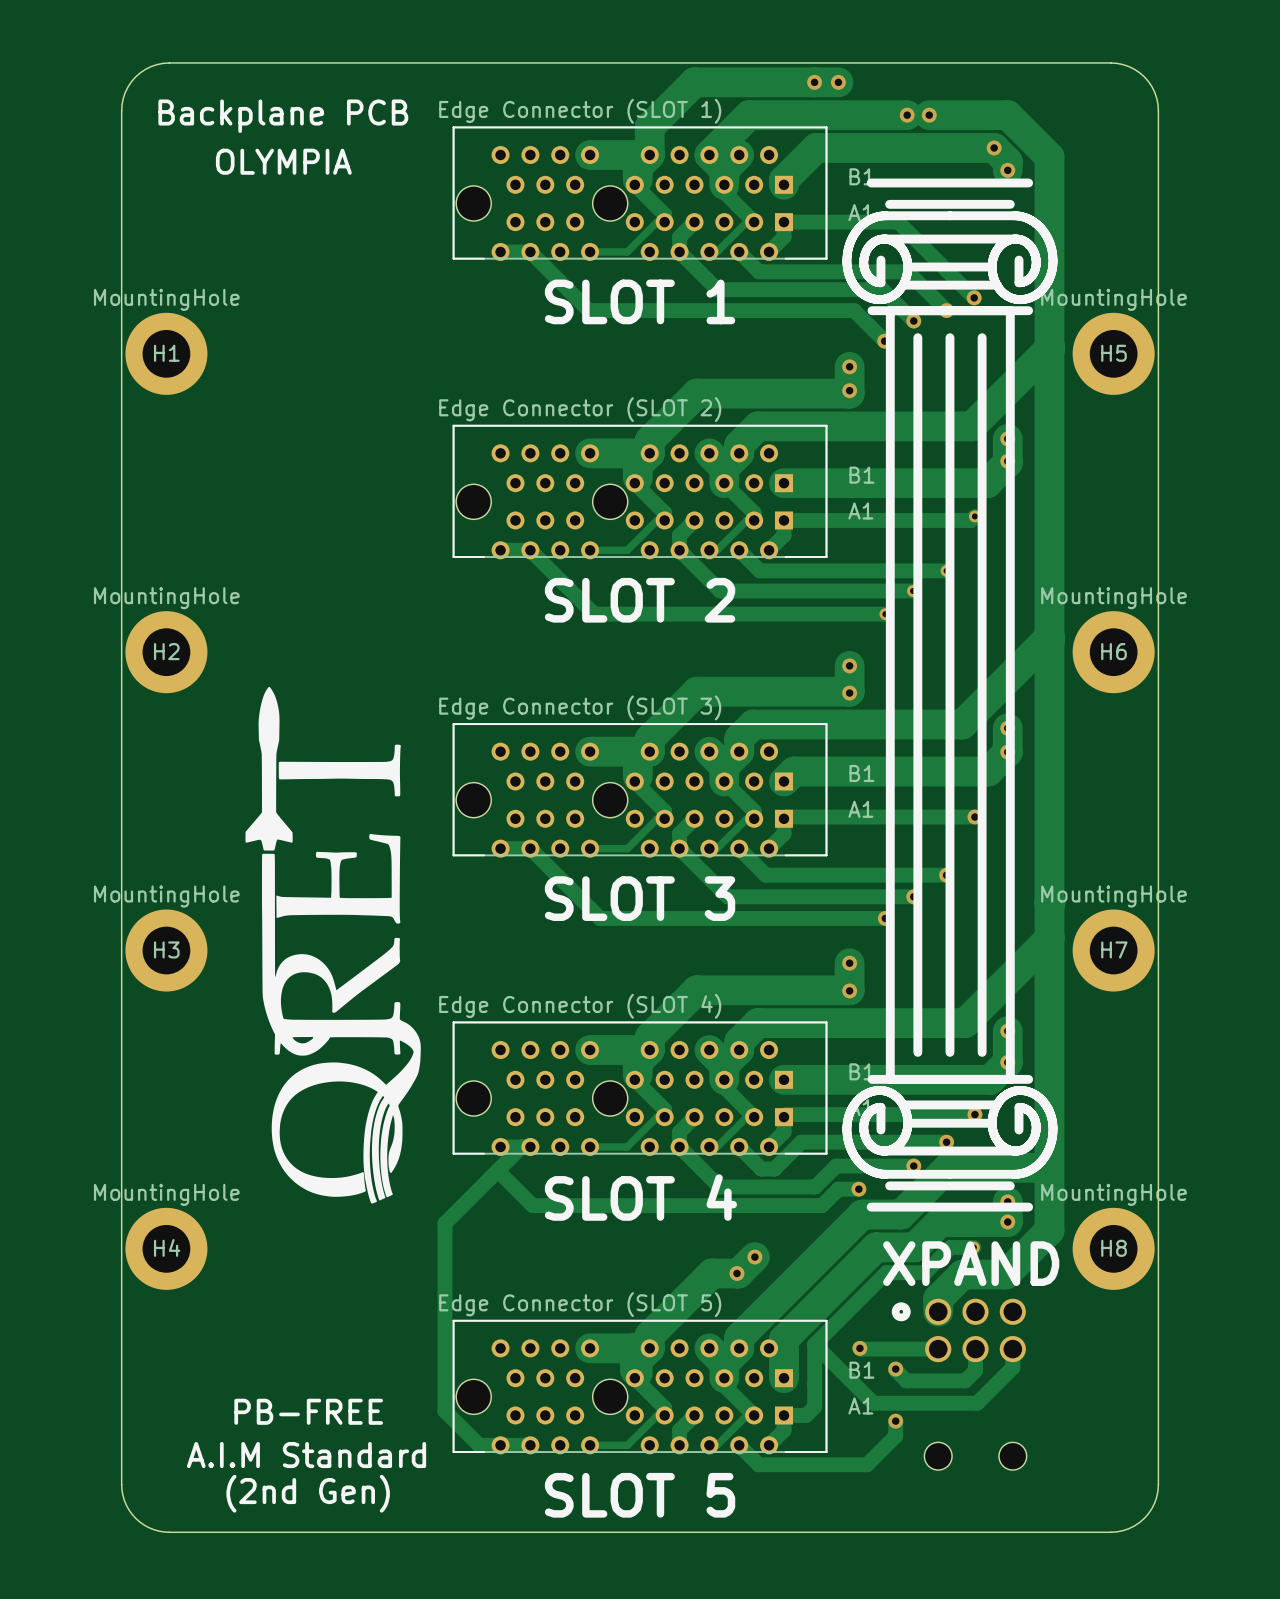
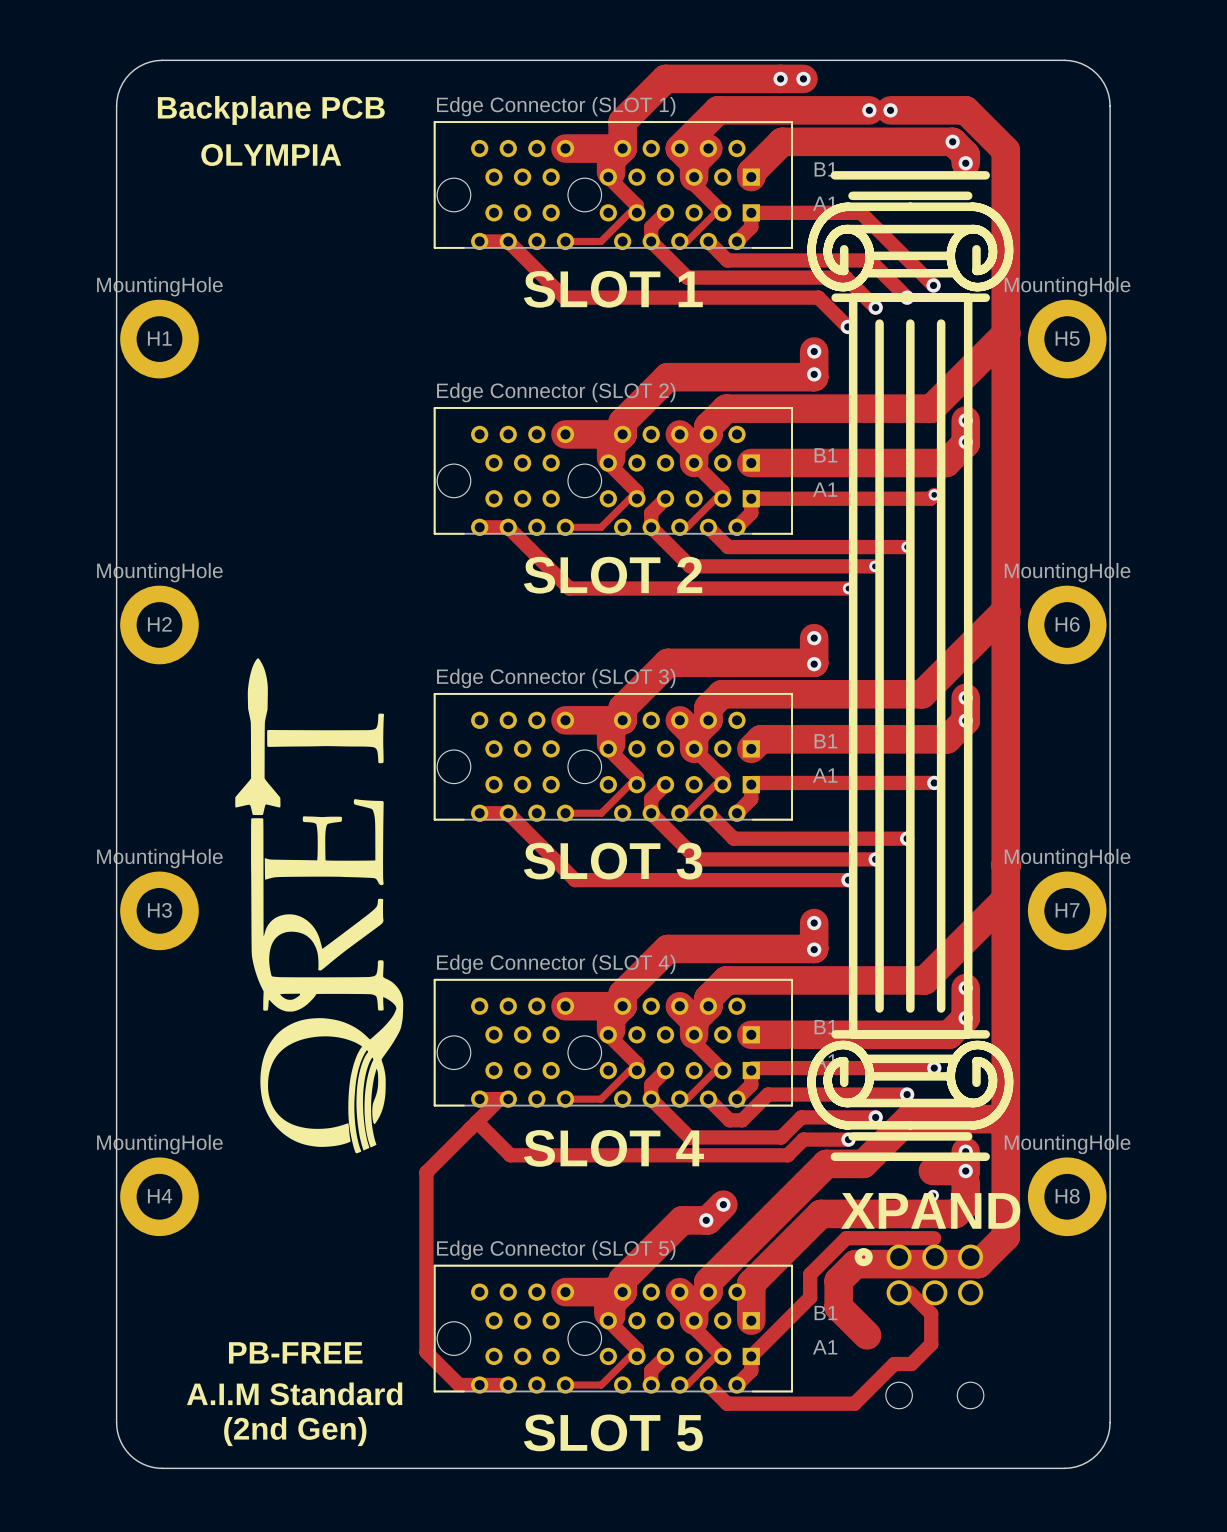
track: none -> (823, 1139) (848, 1139)
via position: (858, 1189) -> (848, 1139)
track: (973, 1222) (939, 1222) (914, 1247) (875, 1247) (856, 1266) -> (965, 1182) (965, 1203) (955, 1213) (820, 1213)
track: (1049, 1230) (1005, 1274) (962, 1274) (938, 1298) (938, 1311) -> (1005, 1179) (1005, 1236) (978, 1264) (855, 1264) (838, 1280) (838, 1307) (867, 1335)
track: (973, 1247) (950, 1247) (925, 1272) (886, 1272) (814, 1344) -> none
track: (814, 1344) (814, 1406) (806, 1415) (783, 1415) -> (934, 1238) (846, 1238) (810, 1274) (810, 1297) (751, 1356)
track: (814, 1344) (873, 1403) (977, 1403) (1012, 1367) (1012, 1349) -> none
track: (859, 1348) (938, 1349) -> none
via: (859, 1348) -> none
track: (975, 1349) (975, 1370) (965, 1380) (906, 1380) (895, 1369) -> none
via: (895, 1369) -> none
track: (895, 1421) (895, 1436) (867, 1464) -> (909, 1292) (931, 1313) (931, 1344) (911, 1364) (894, 1364) (854, 1403) (830, 1403)
via: (895, 1421) -> none

